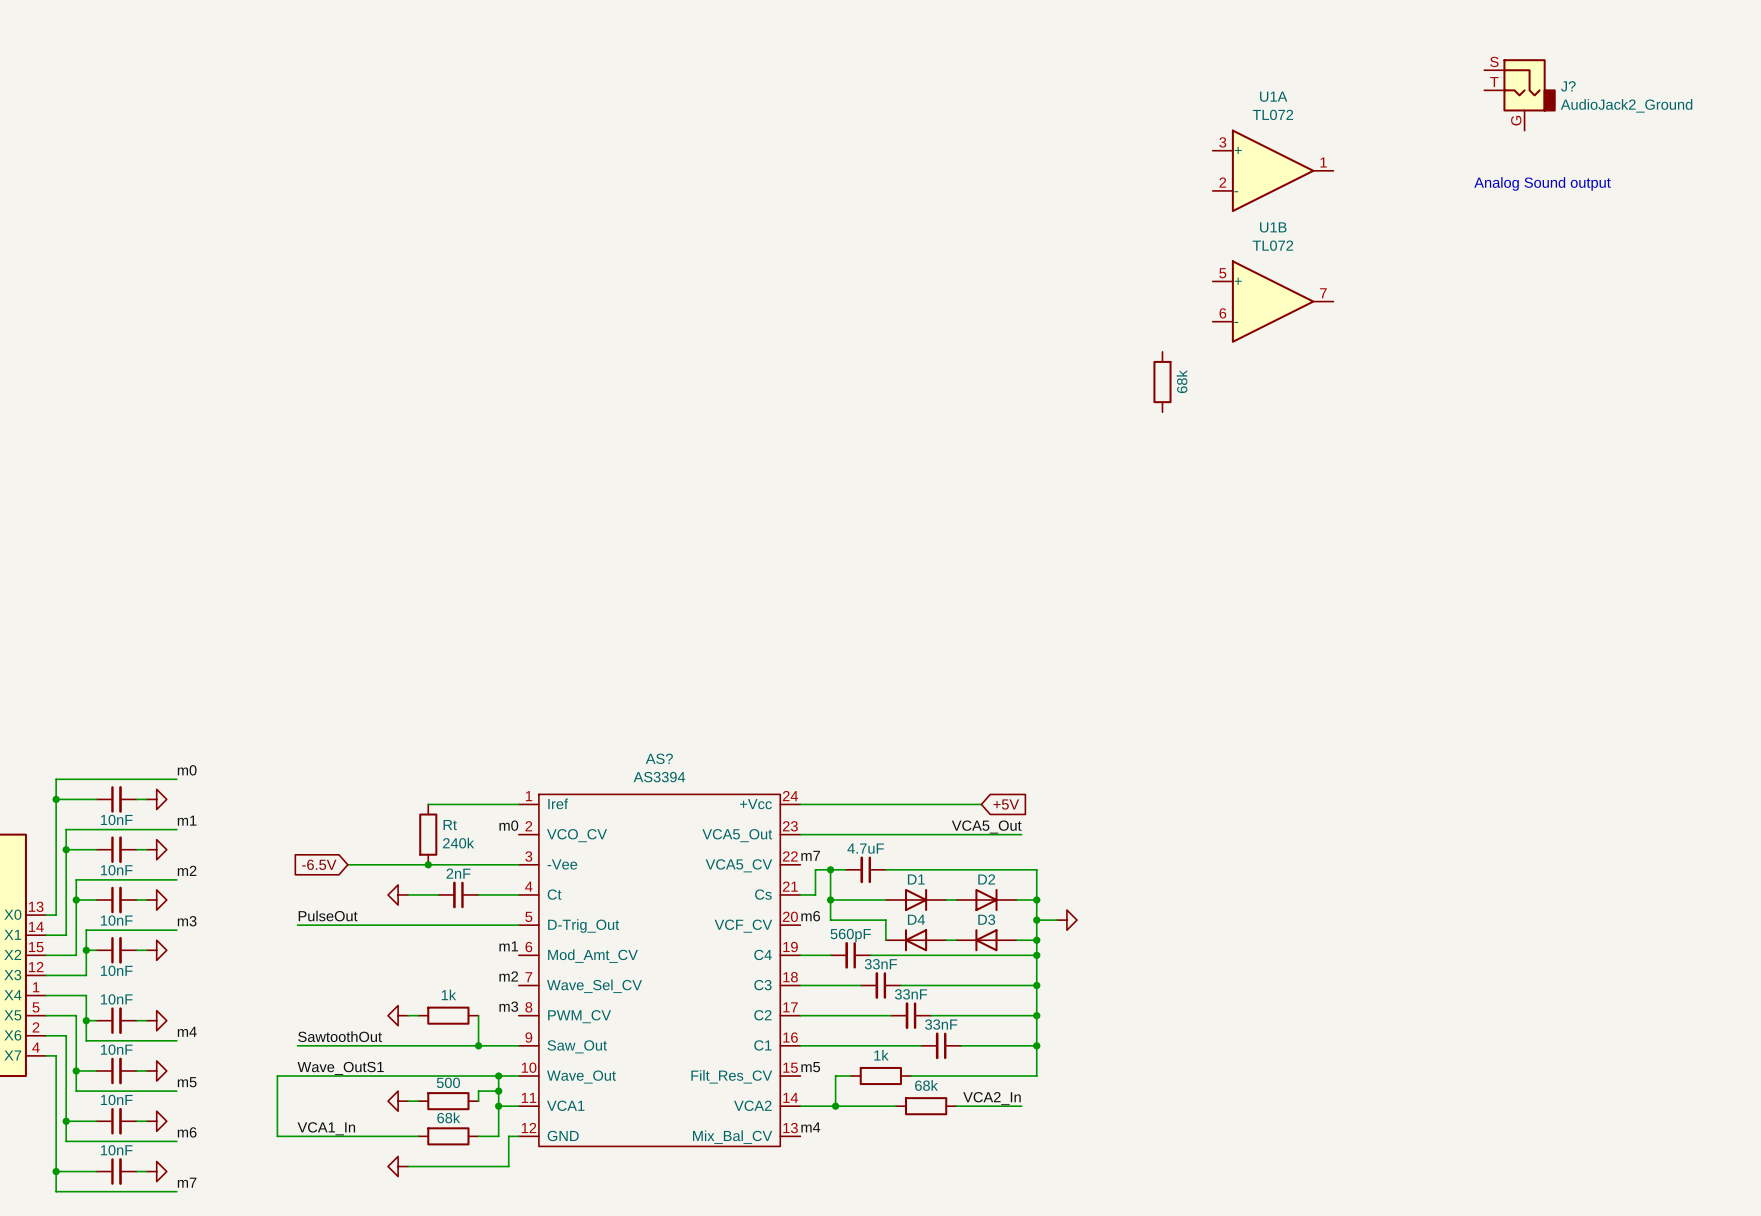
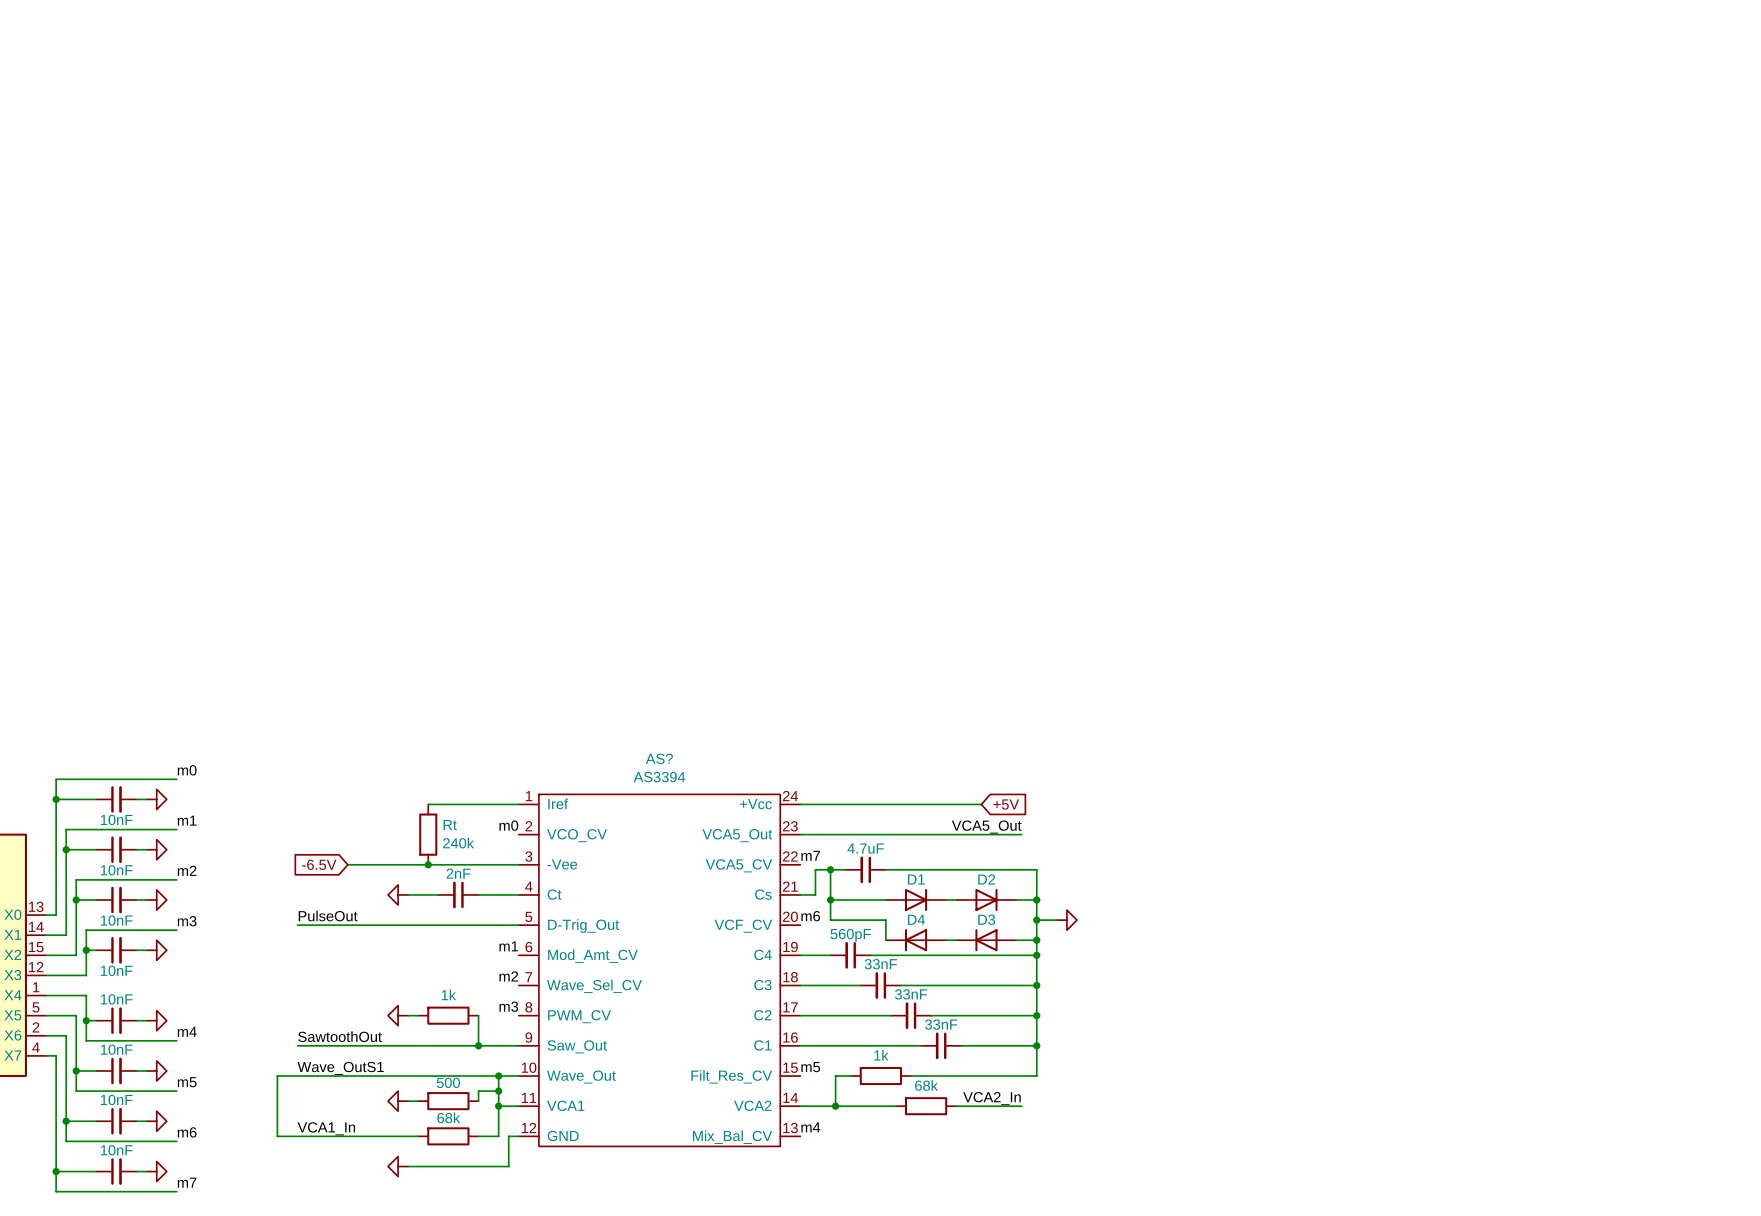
J?: AudioJack2_Ground (1520, 94) -> none
U1A: TL072 (1273, 170) -> none
text: Analog Sound output (1542, 183) -> none
U1B: TL072 (1273, 301) -> none
part: 68k (1162, 382) -> none

